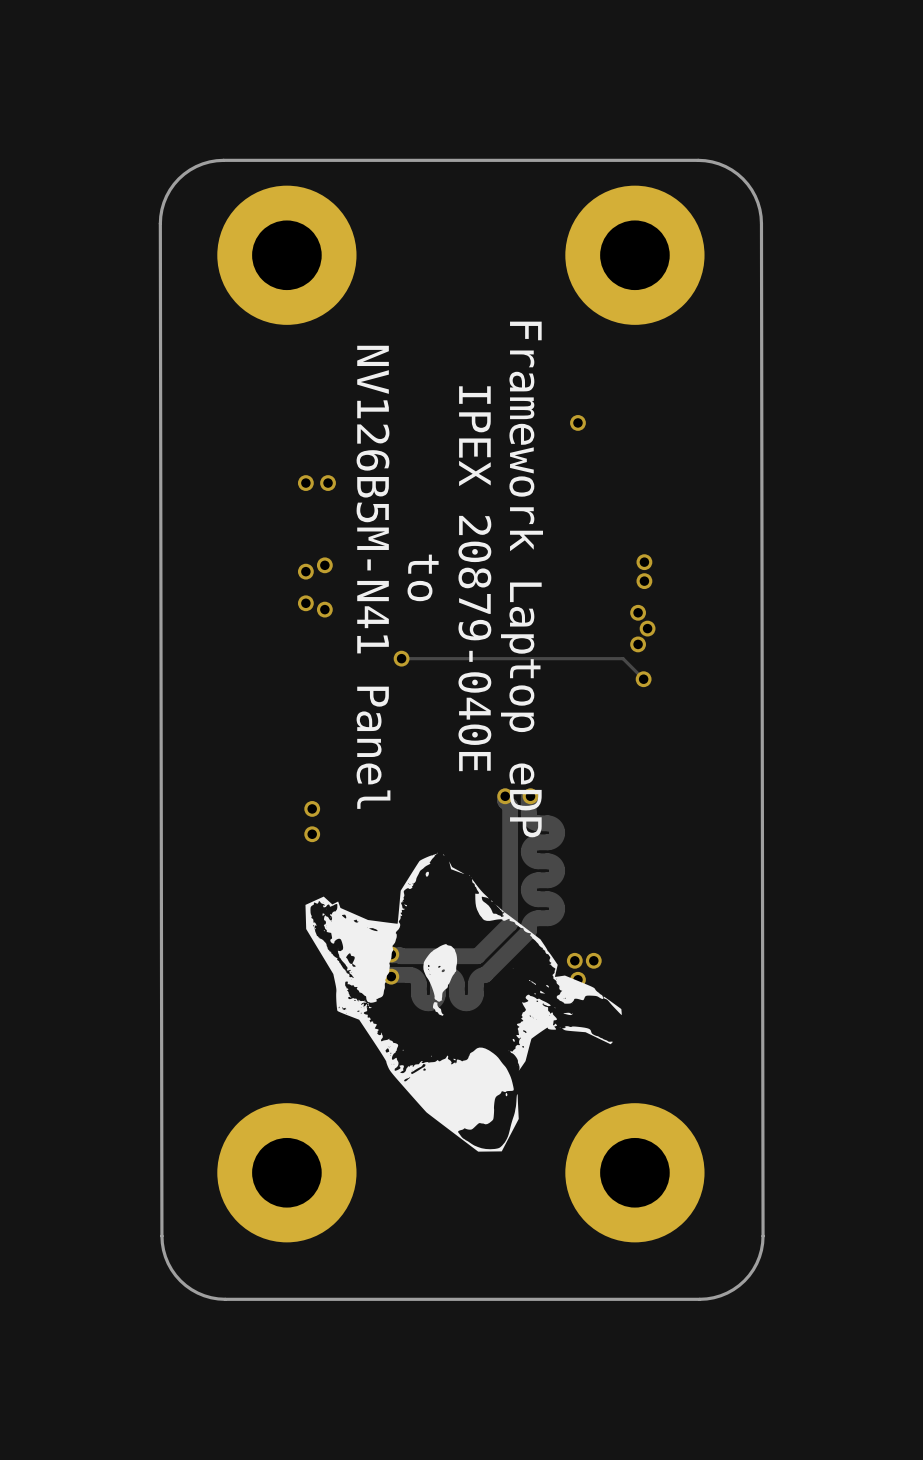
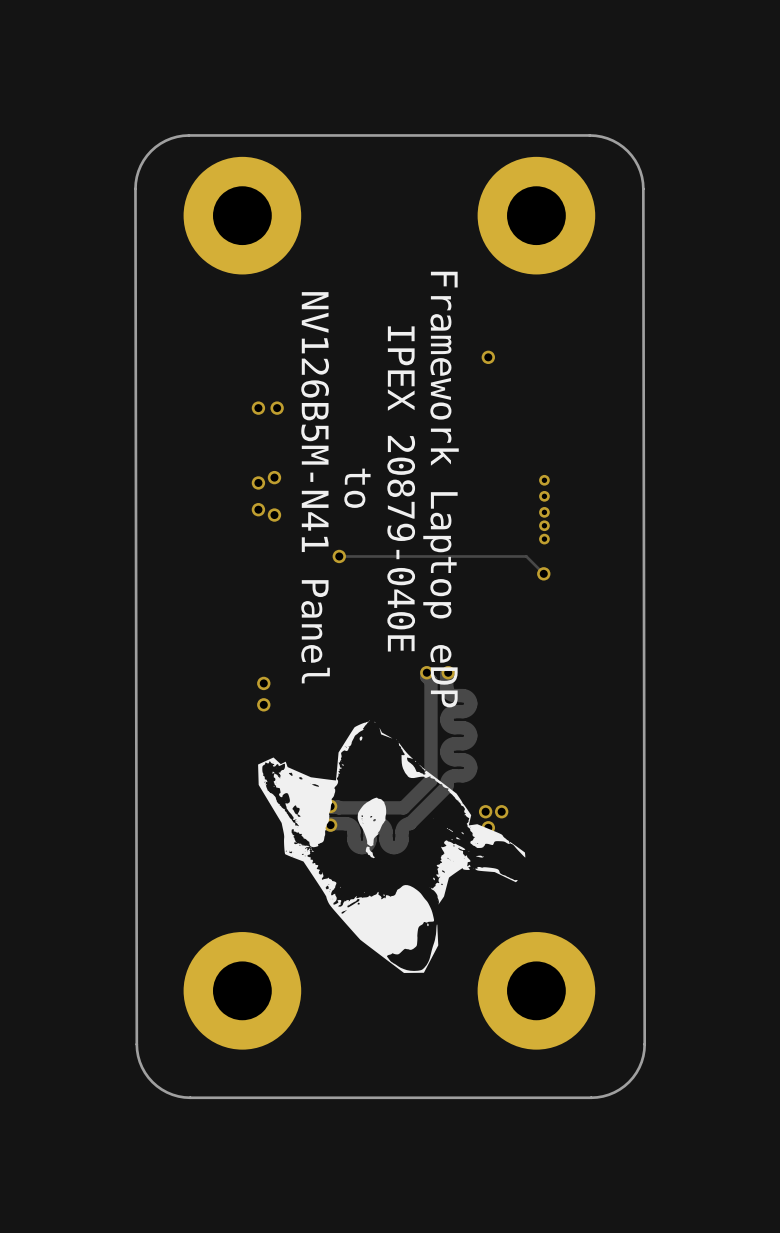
via: (644, 562) -> none
via: none -> (544, 480)
via: (644, 581) -> none
via: none -> (544, 496)
via: none -> (544, 512)
via: (638, 612) -> none
via: none -> (544, 525)
via: (647, 628) -> none
via: none -> (544, 539)
via: (638, 644) -> none

